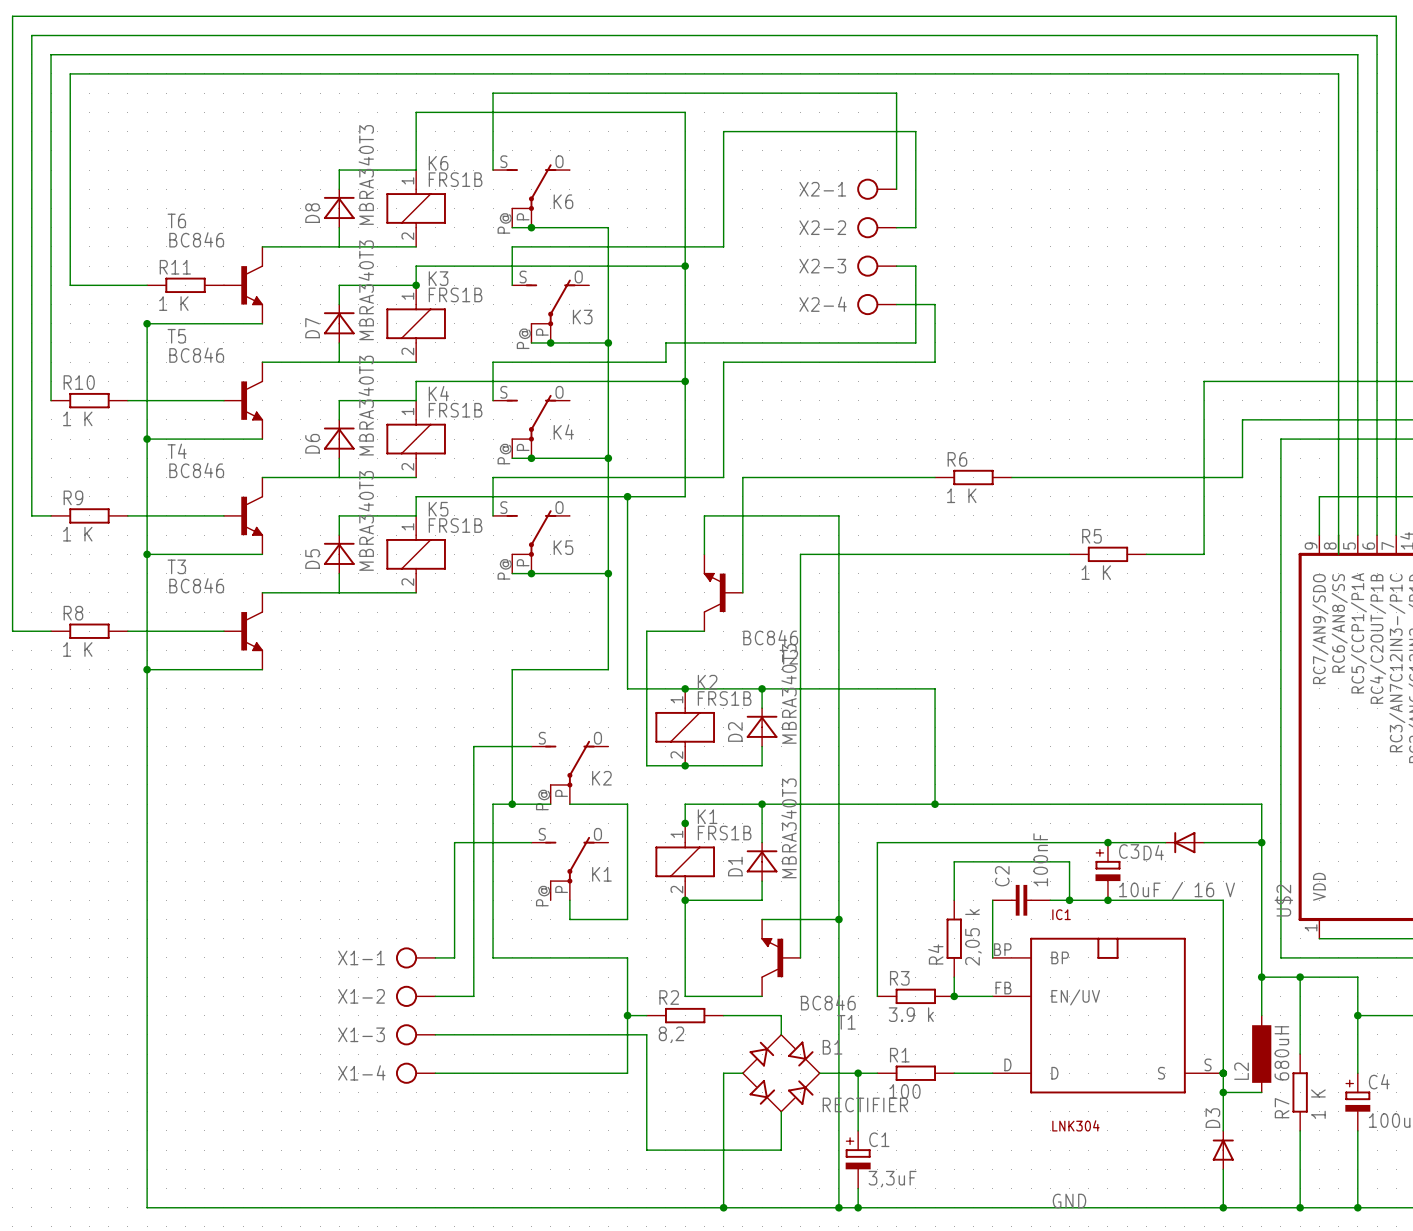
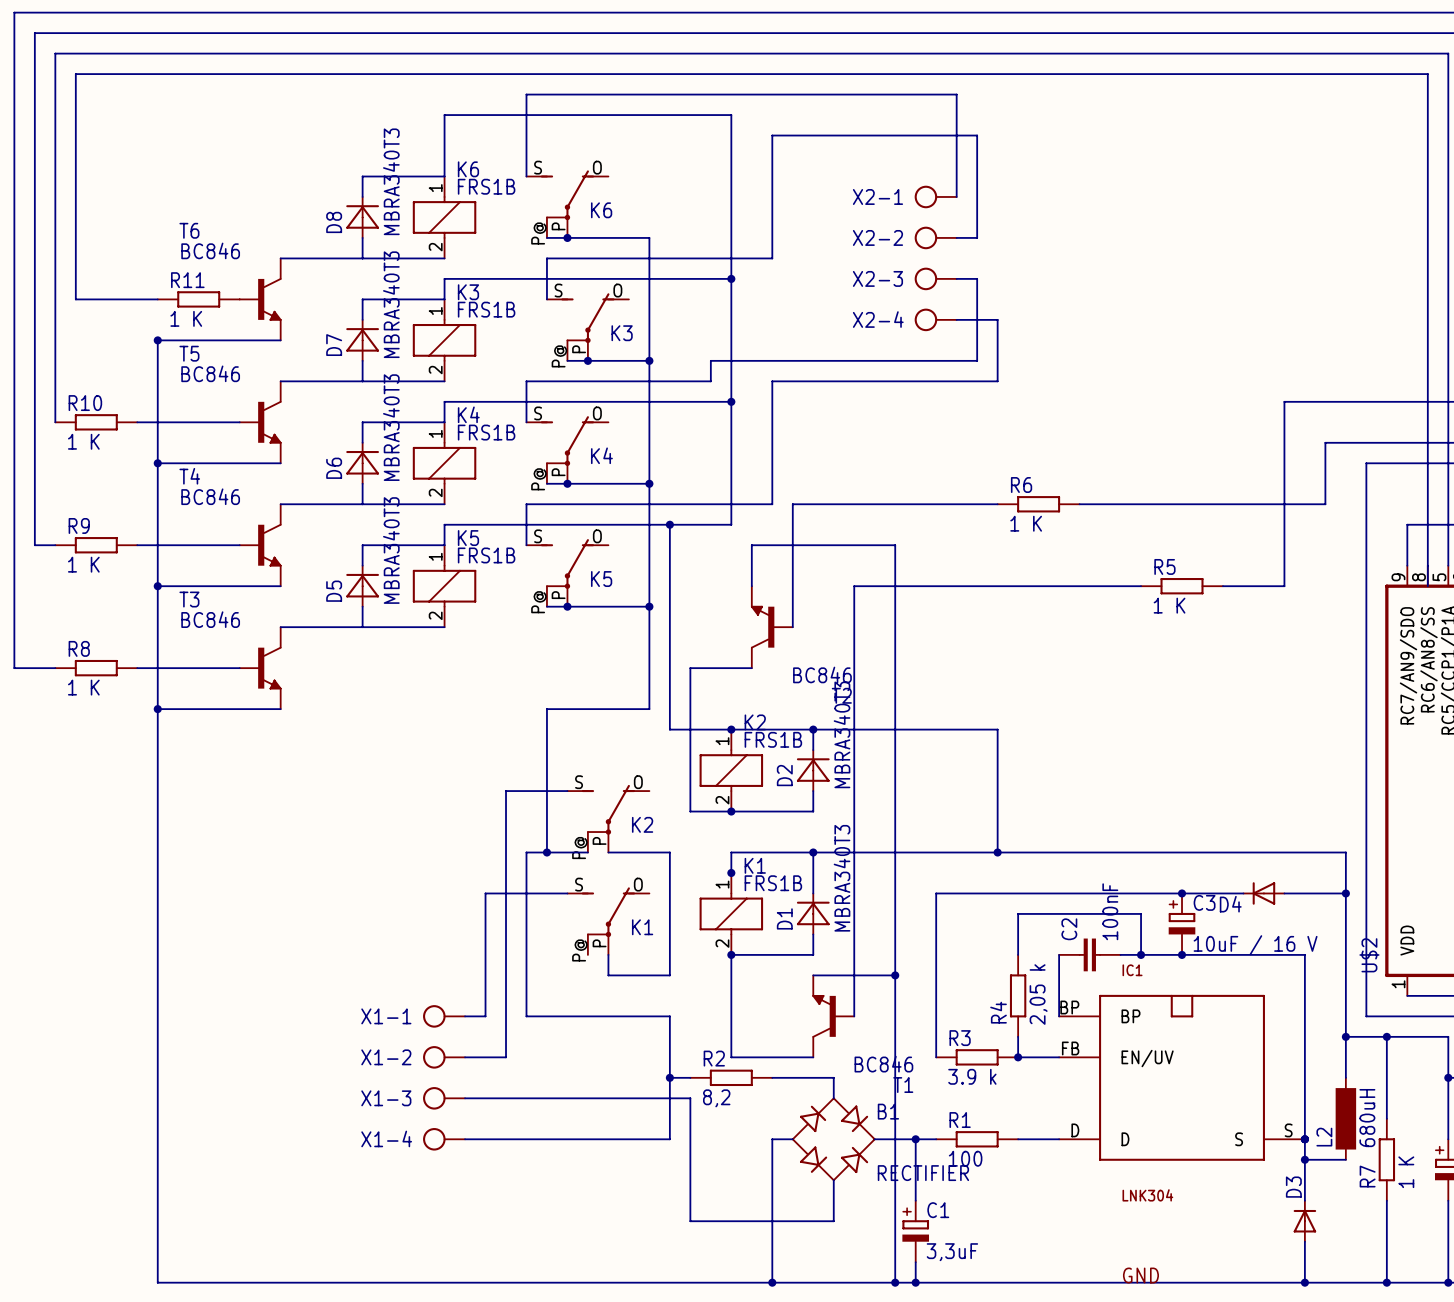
junction: (416, 285) -> none

